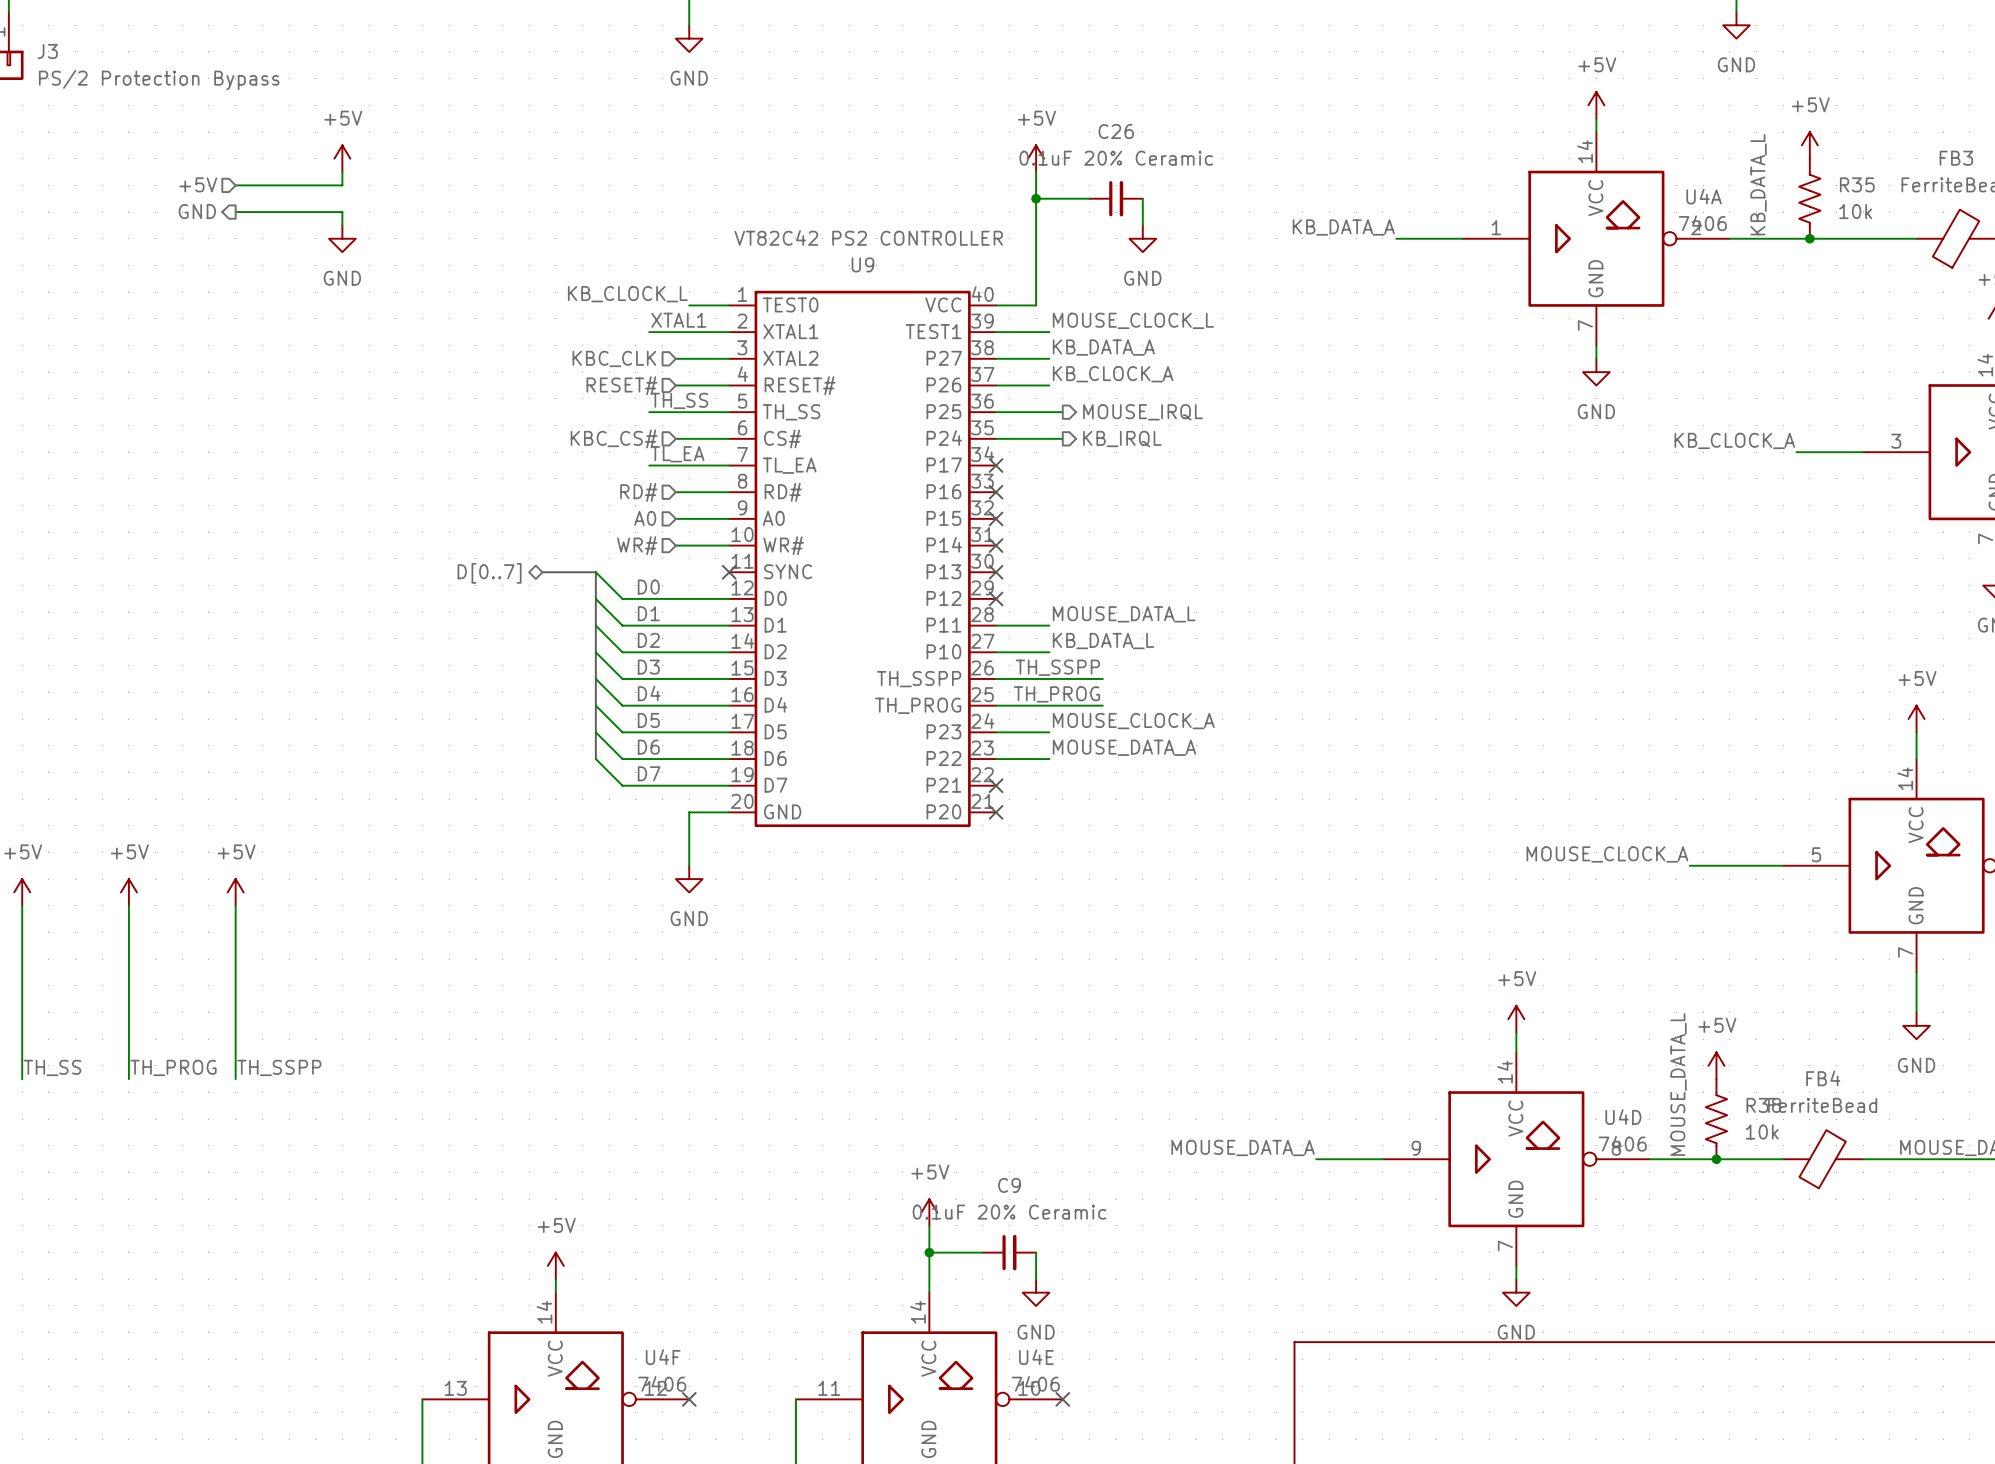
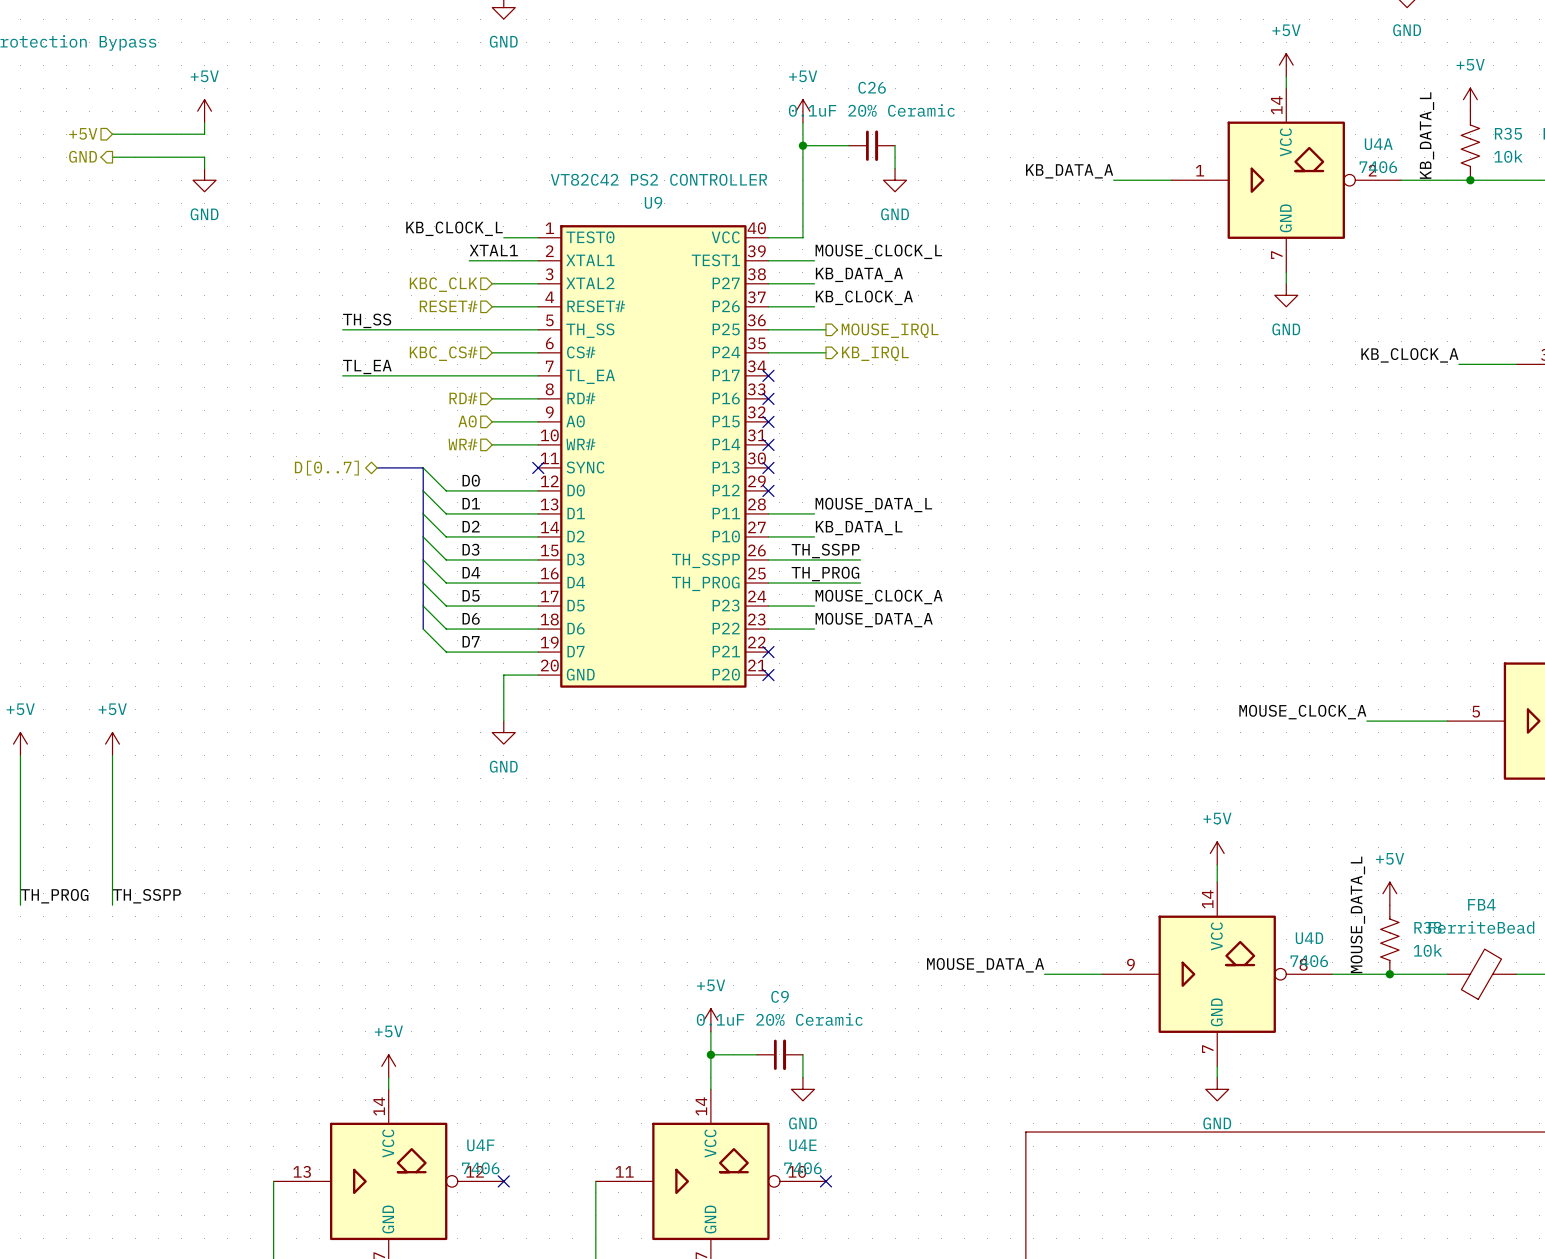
label position: TH_SS (679, 400) -> TH_SS (367, 320)
wire: none -> (342, 329) (469, 329)
label position: TL_EA (677, 454) -> TL_EA (367, 366)
wire: none -> (342, 375) (469, 375)

